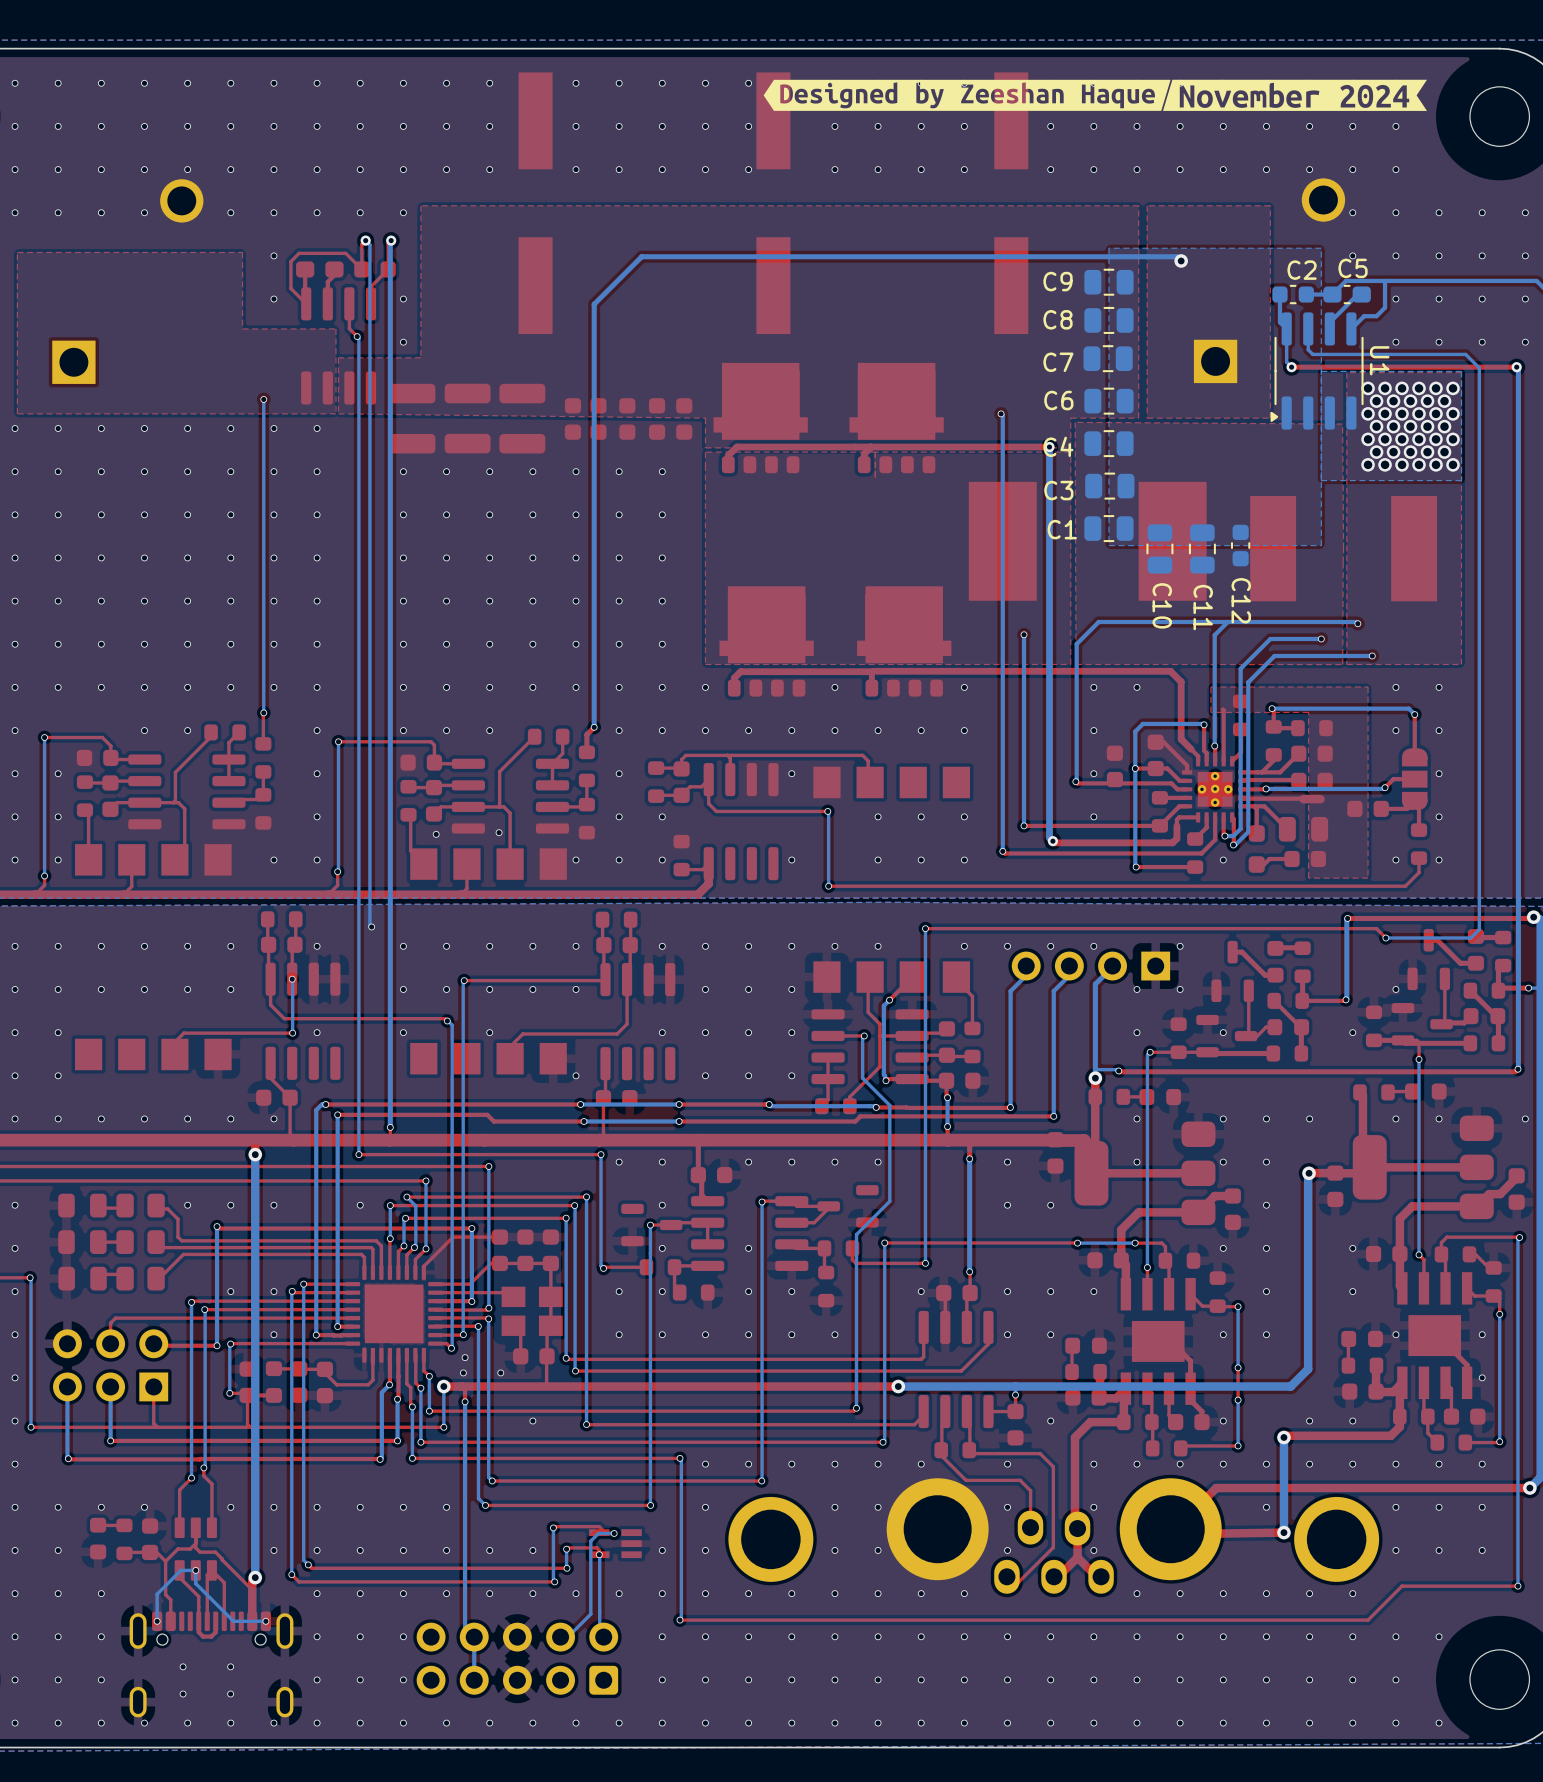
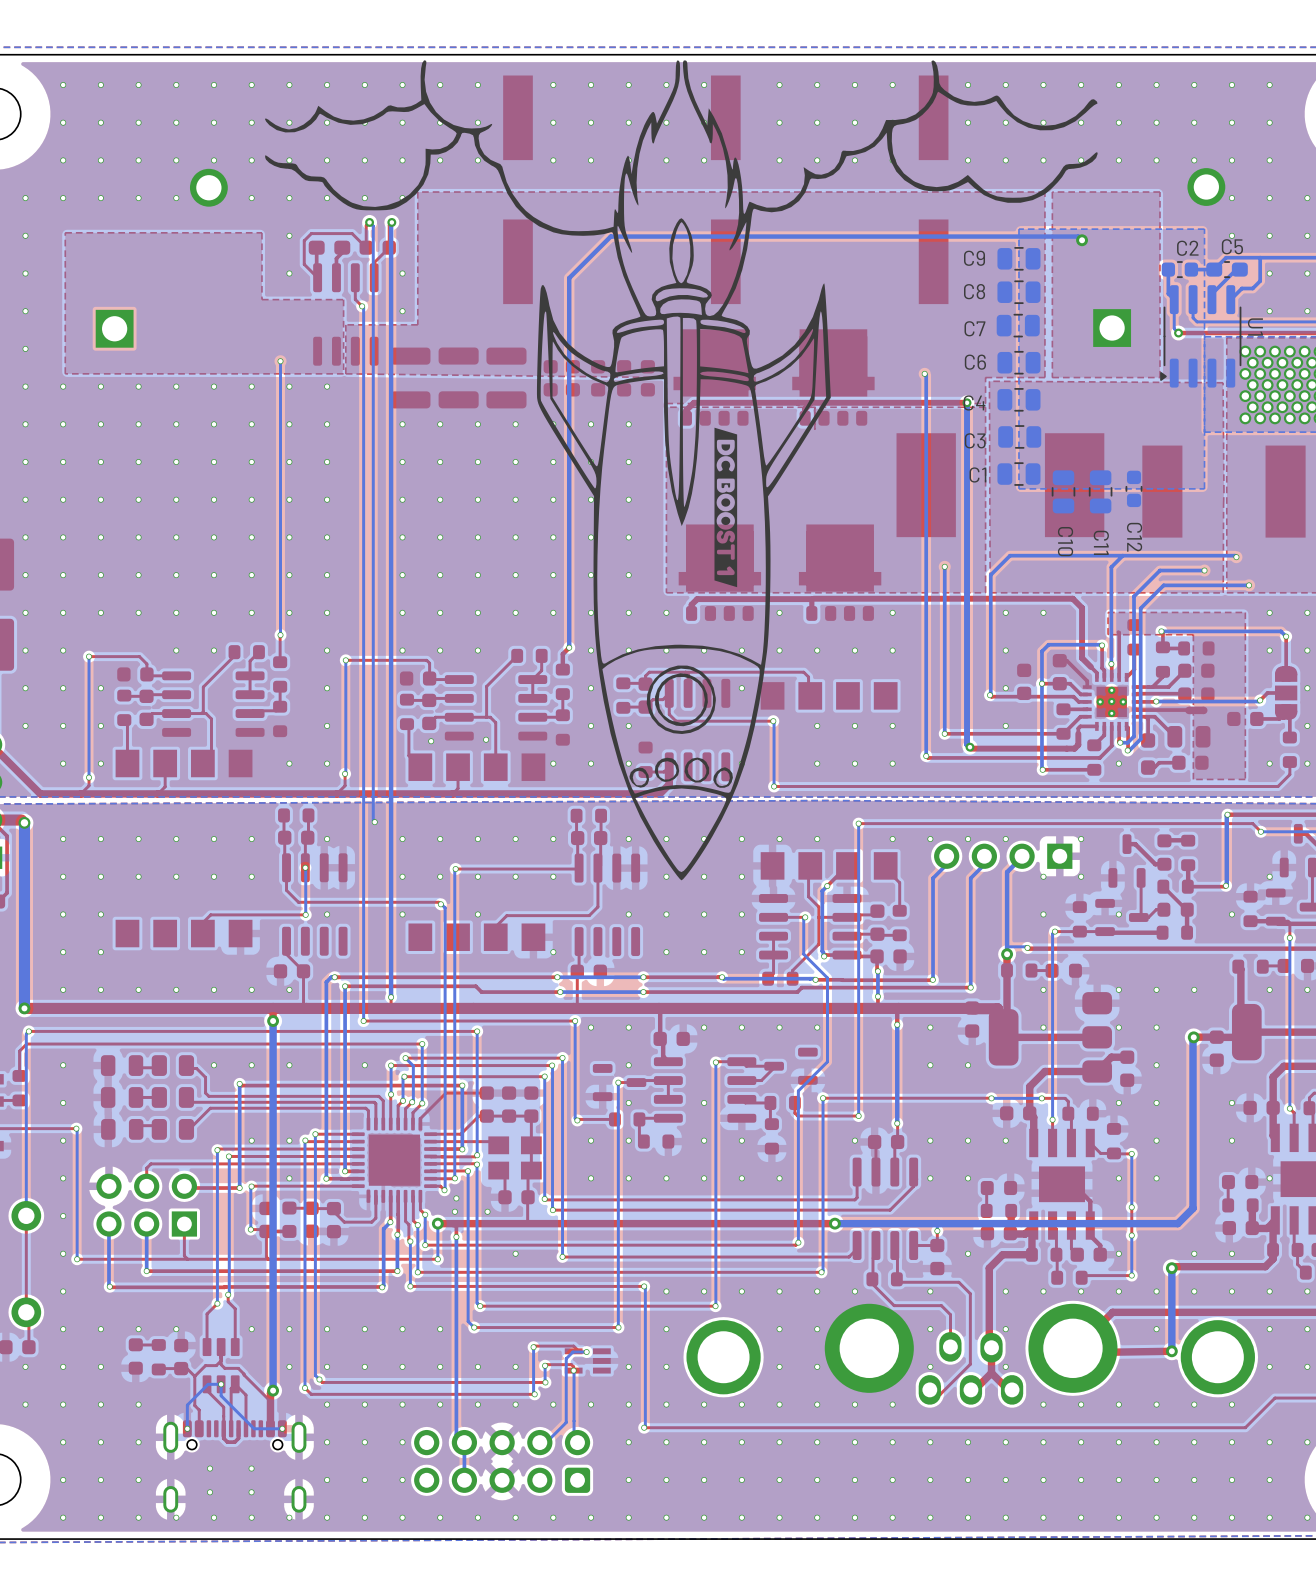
drawing: none -> [264, 60, 1098, 881]
drawing: [763, 79, 1427, 111] -> none

